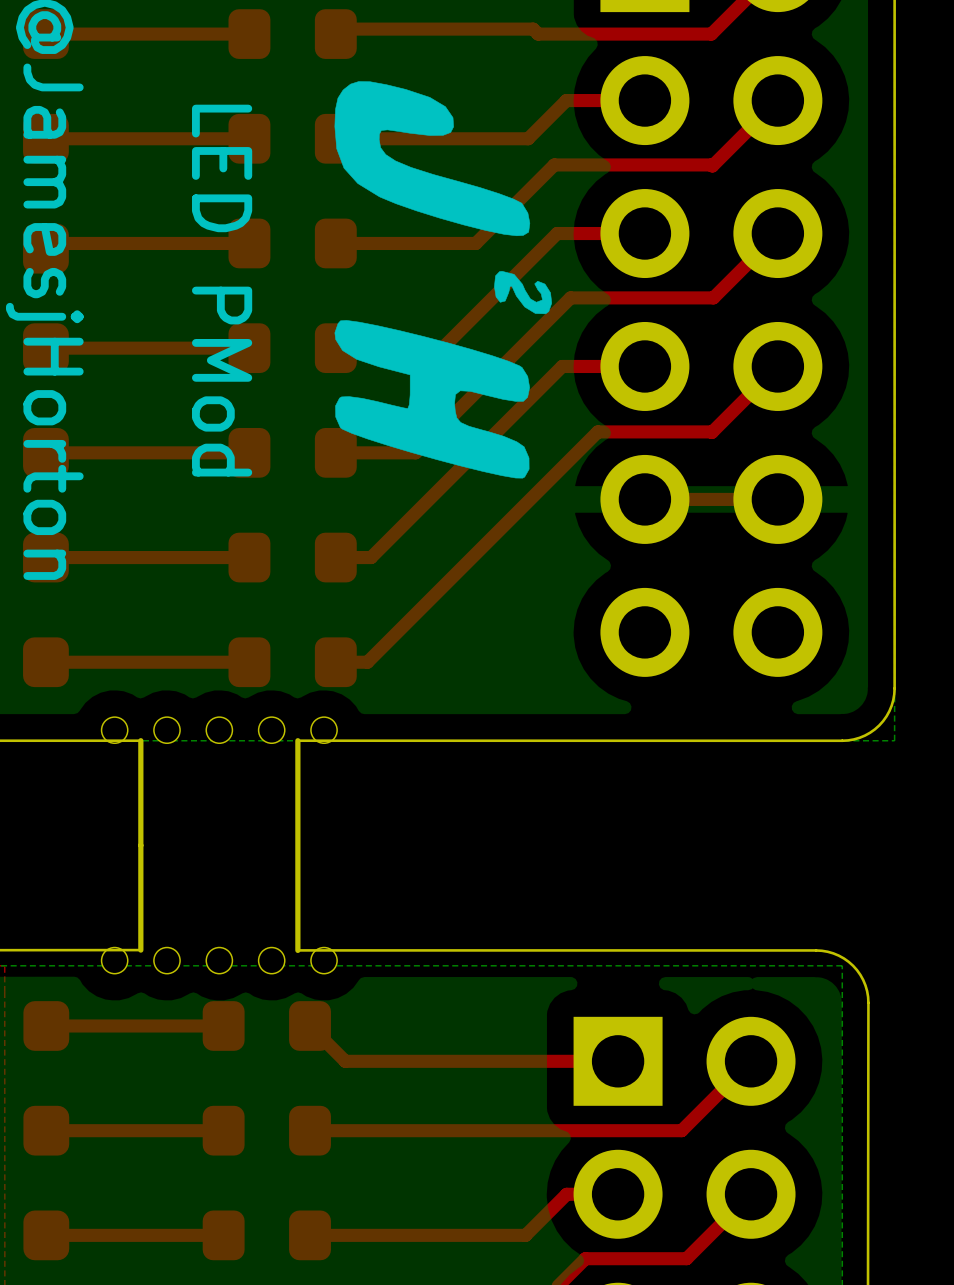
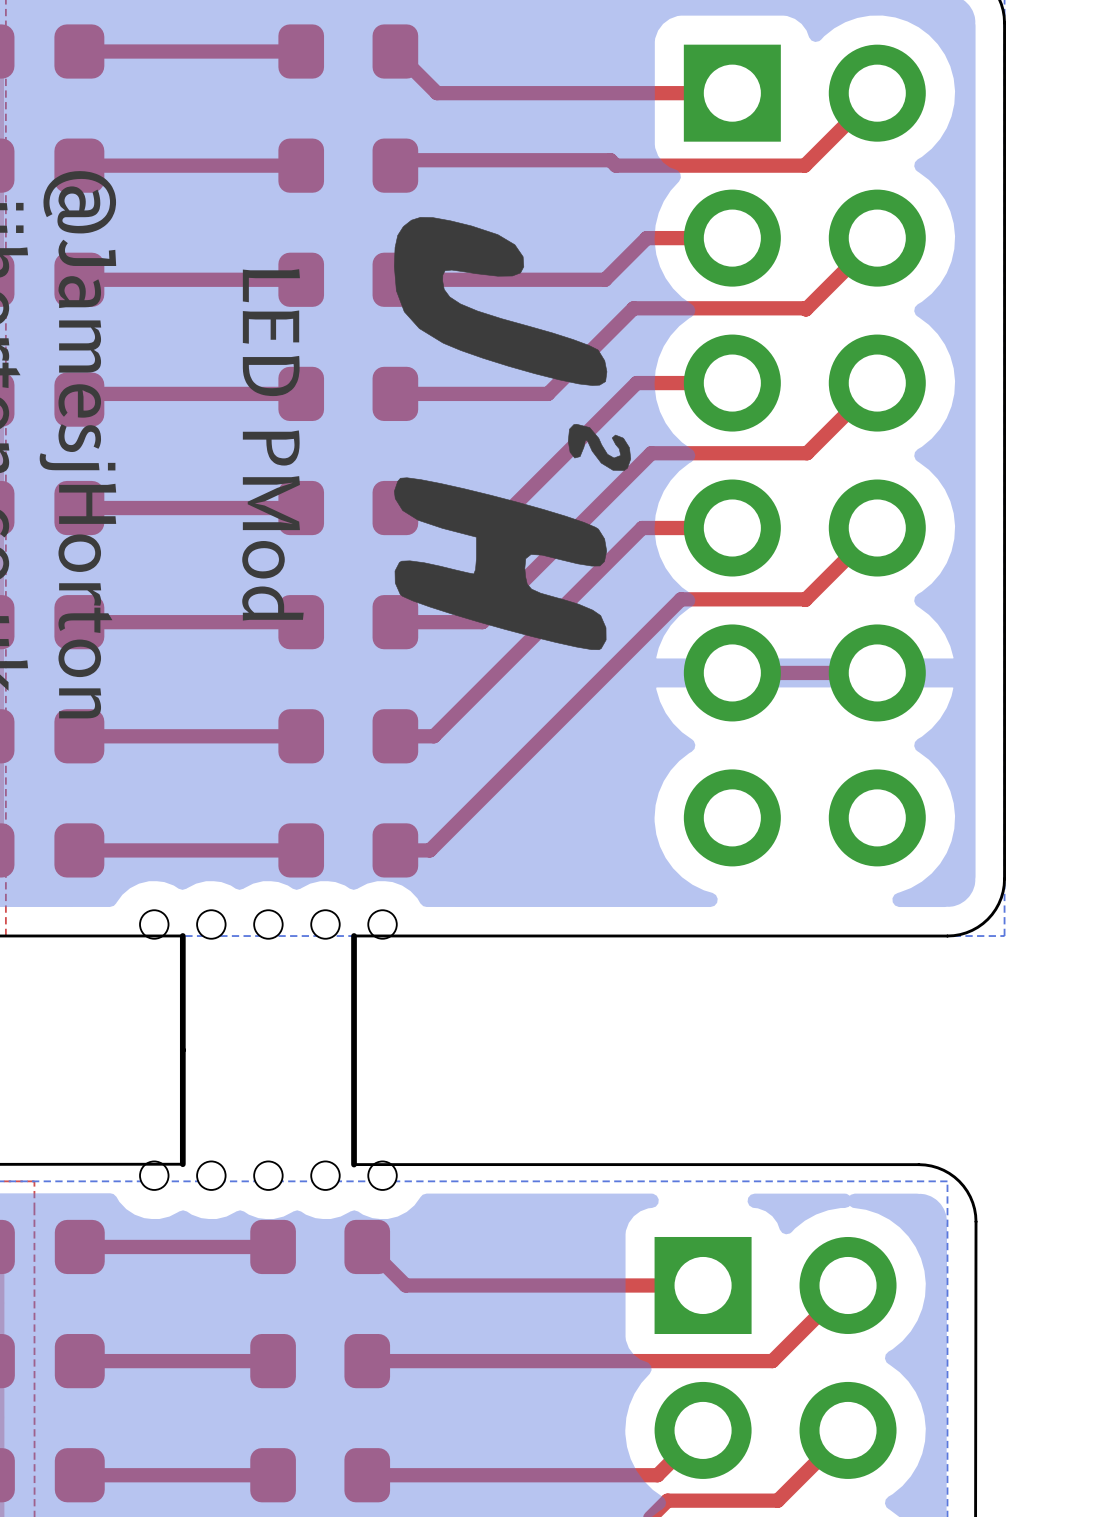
top track: (617, 1194) (566, 1194) (525, 1235) -> (702, 1430) (657, 1475) (602, 1475)

